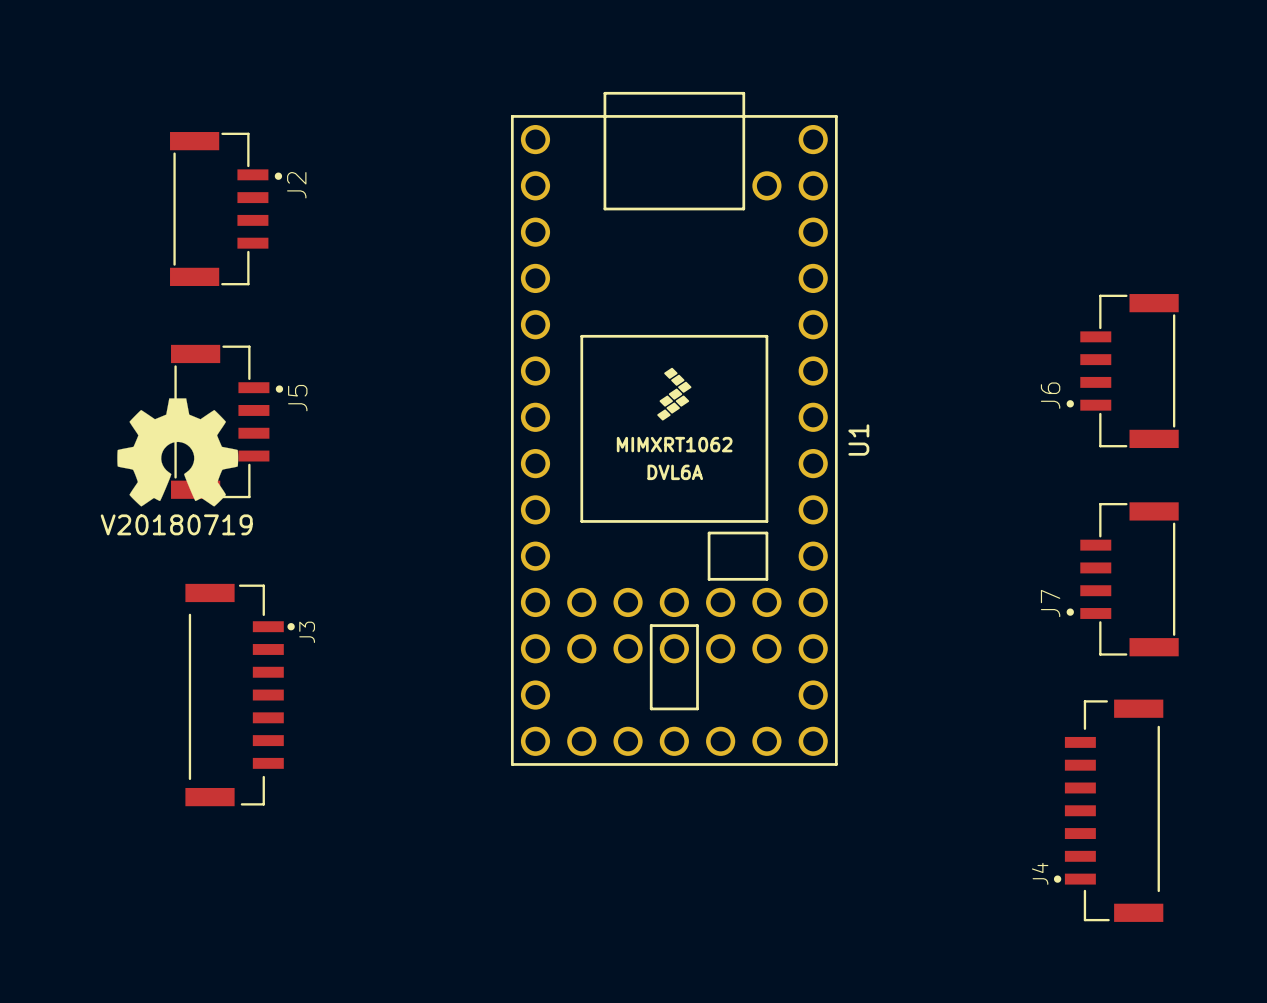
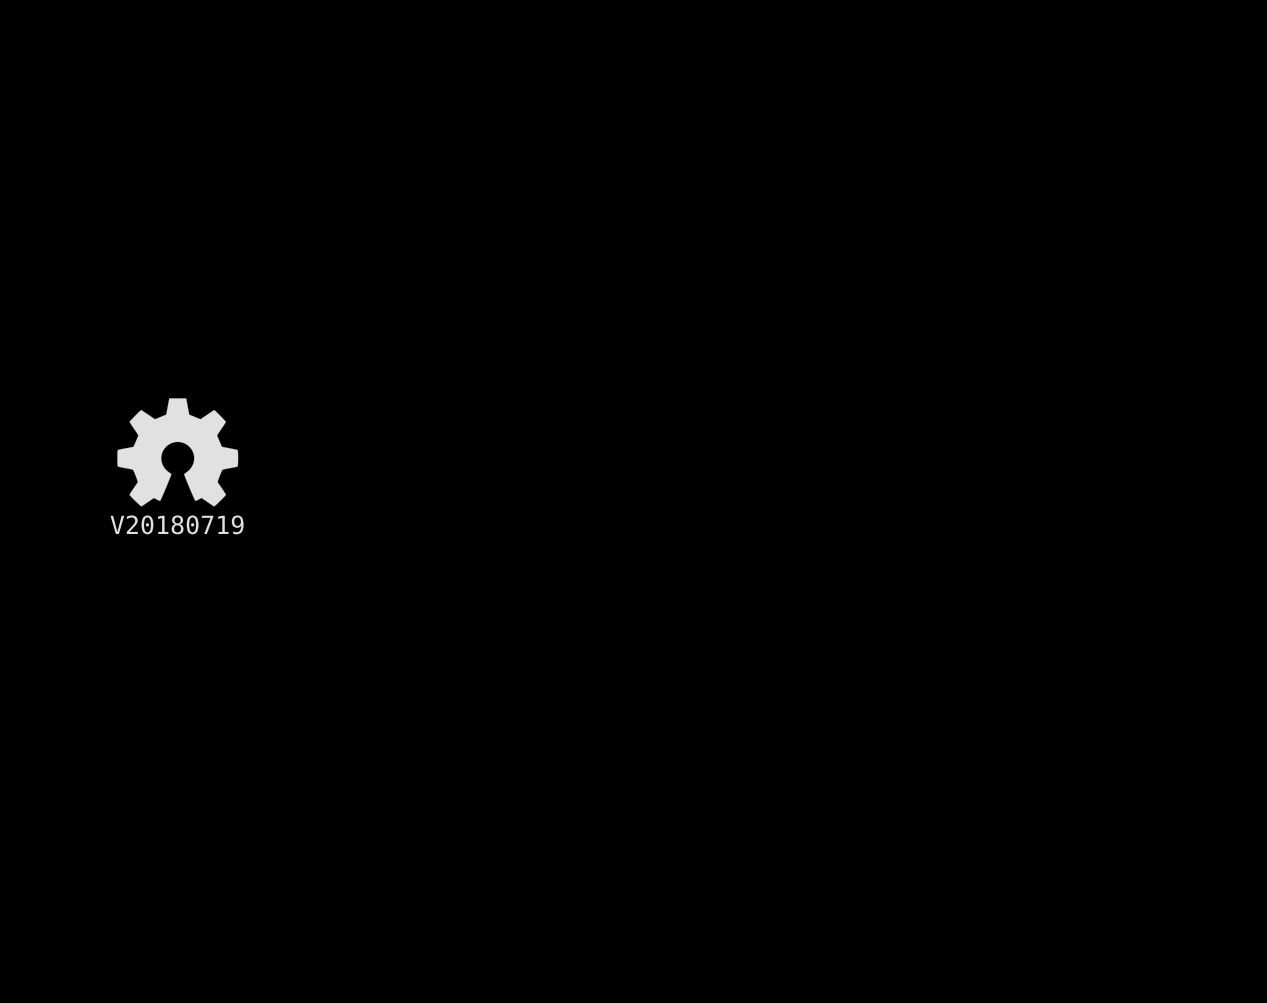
J2: (226, 209) -> none
J6: (1122, 371) -> none
J5: (227, 421) -> none
U1: (674, 428) -> none
J7: (1122, 579) -> none
J3: (240, 695) -> none
J4: (1108, 810) -> none

